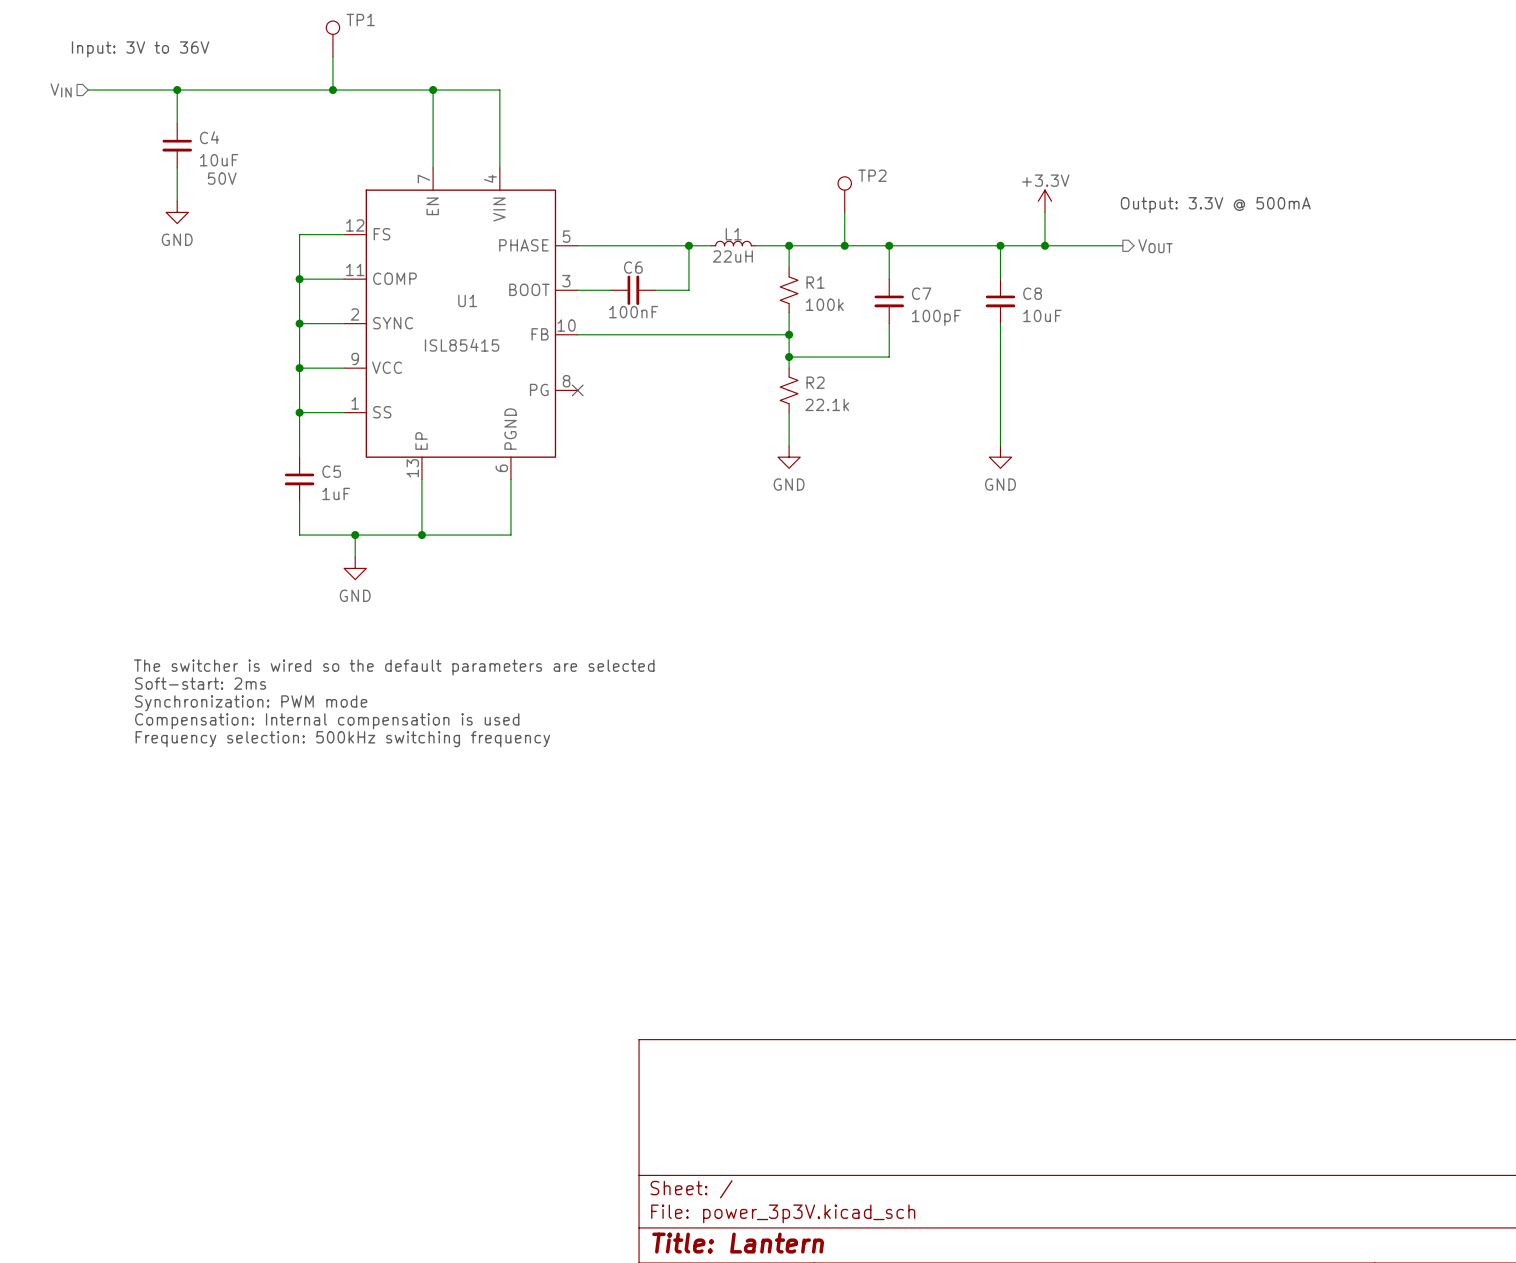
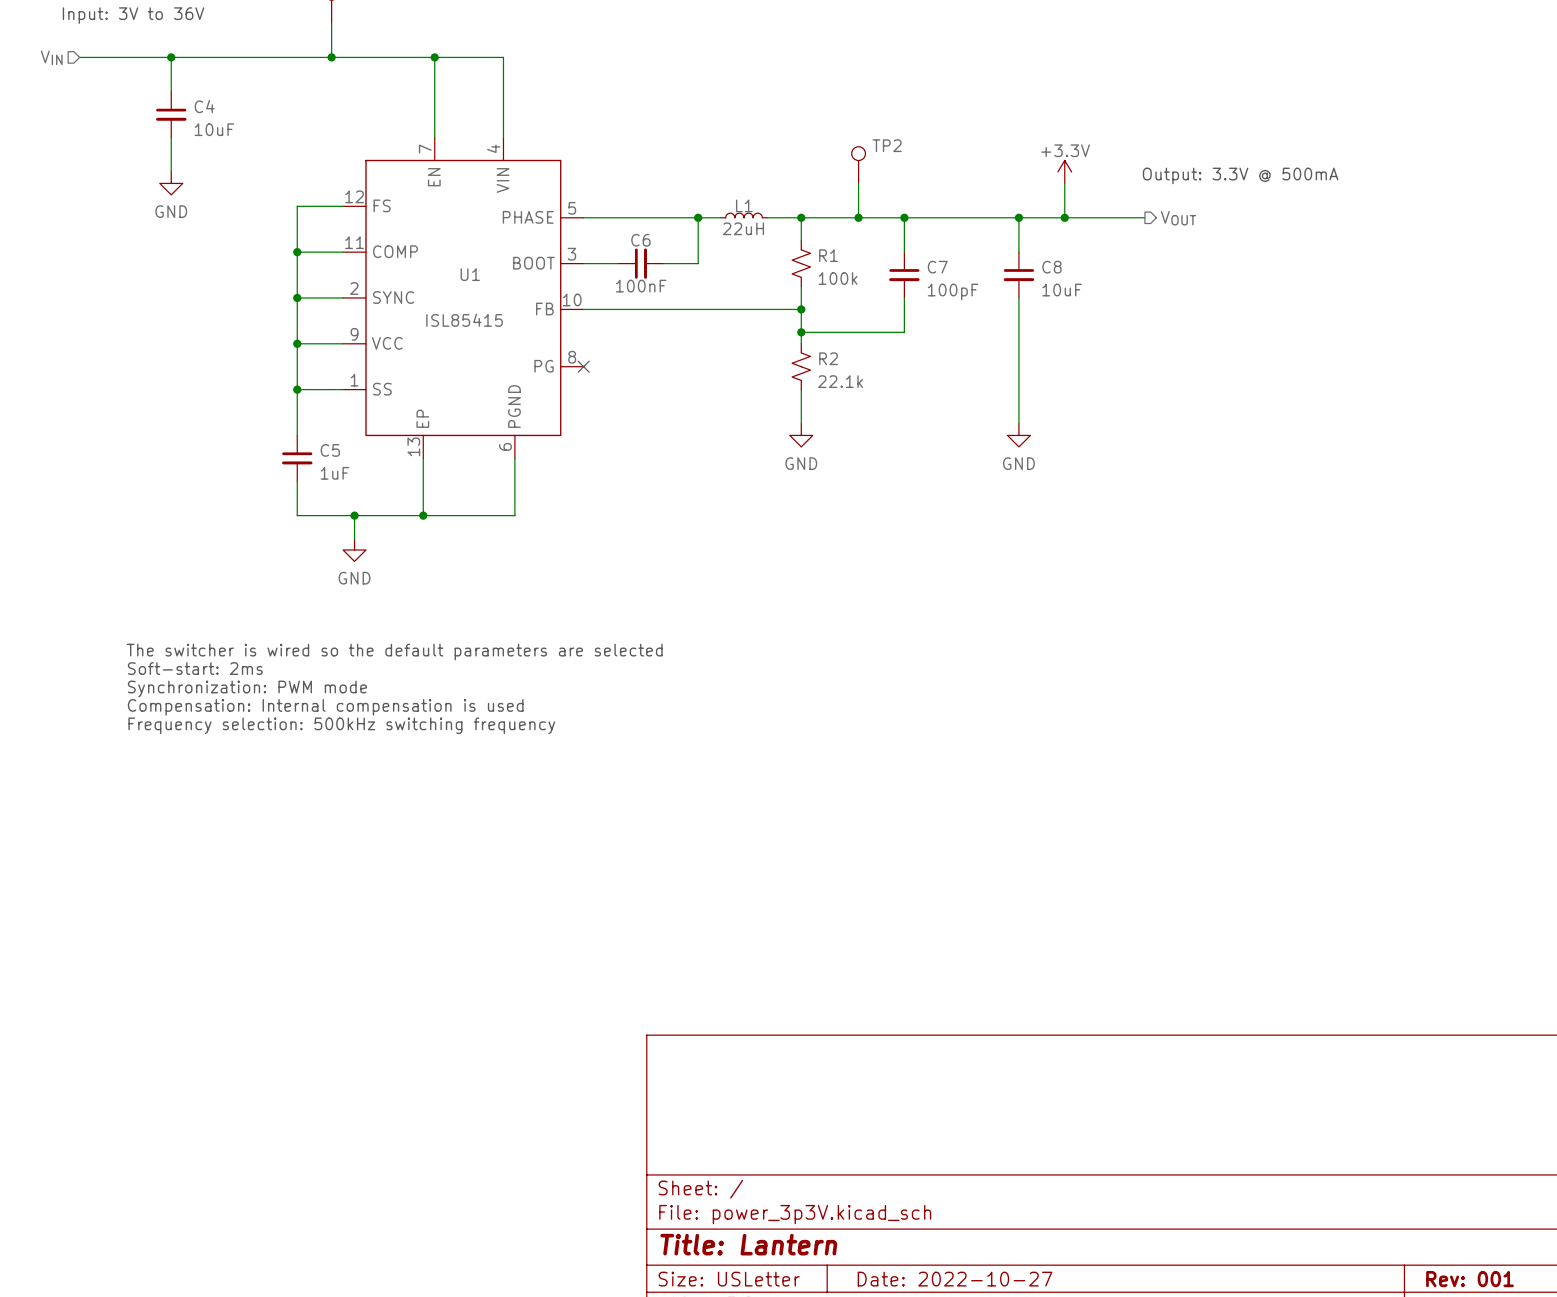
C4 text: 50V (222, 178) -> none

